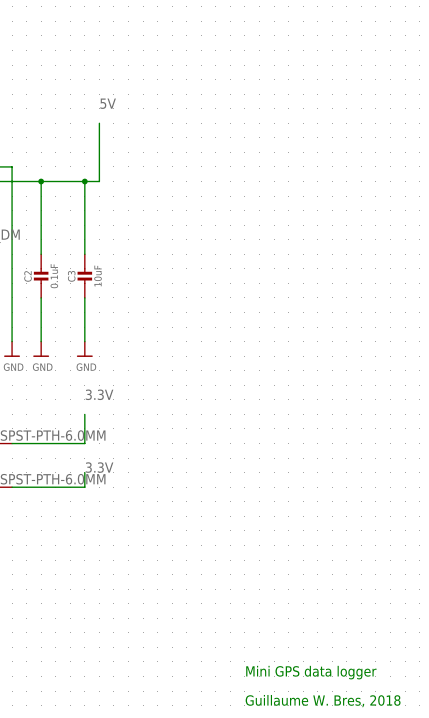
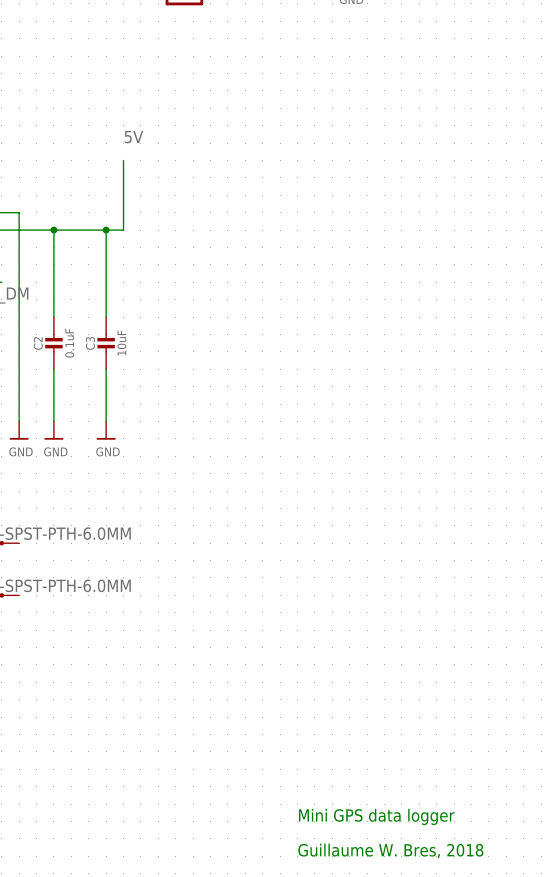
label: 3.3V (99, 394) -> none
wire: (84, 414) (84, 443) (12, 443) -> none
label: 3.3V (99, 467) -> none
wire: (84, 472) (84, 487) (12, 487) -> none

